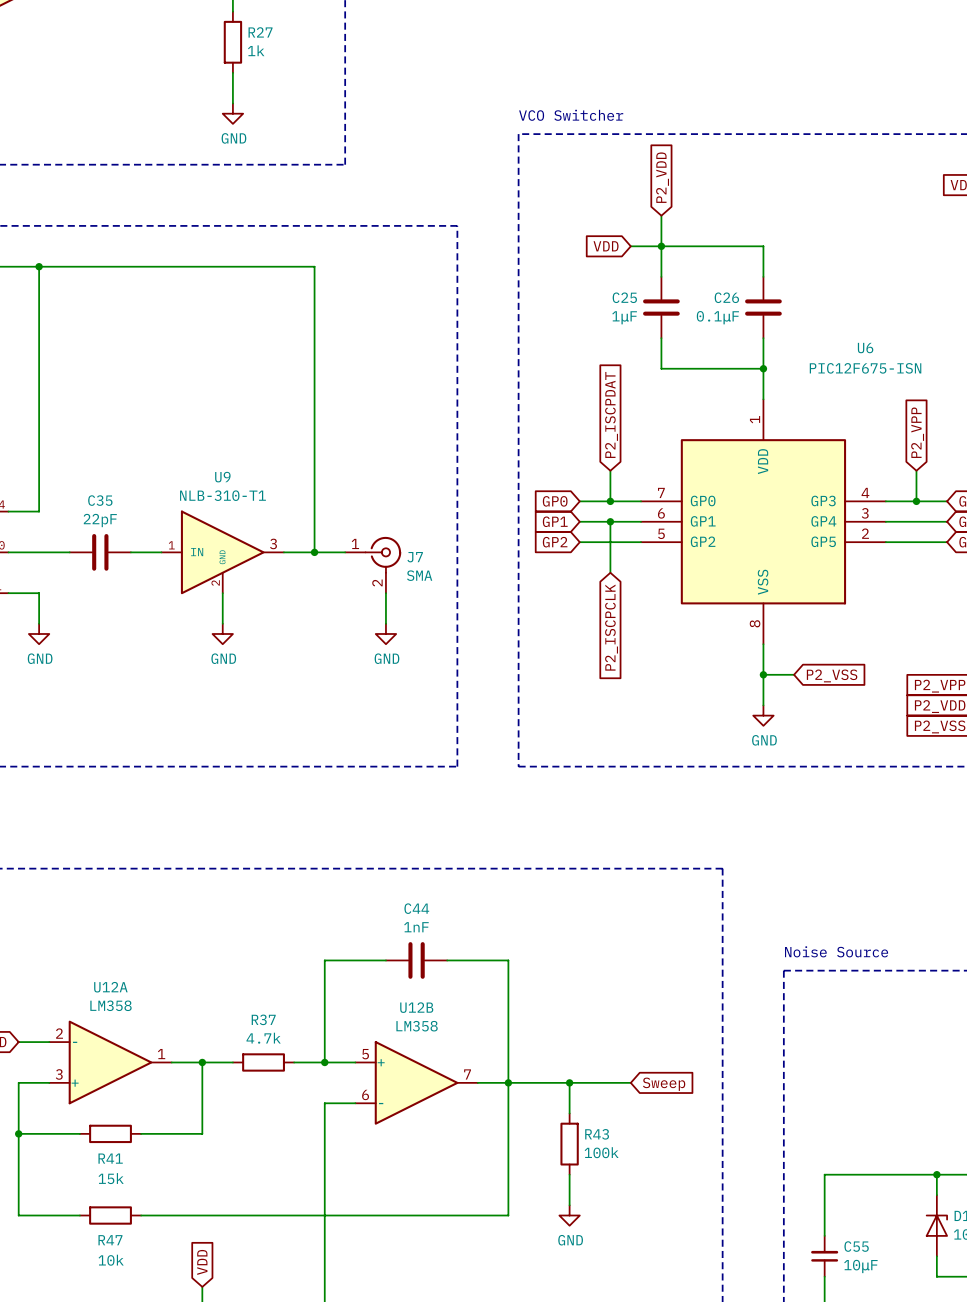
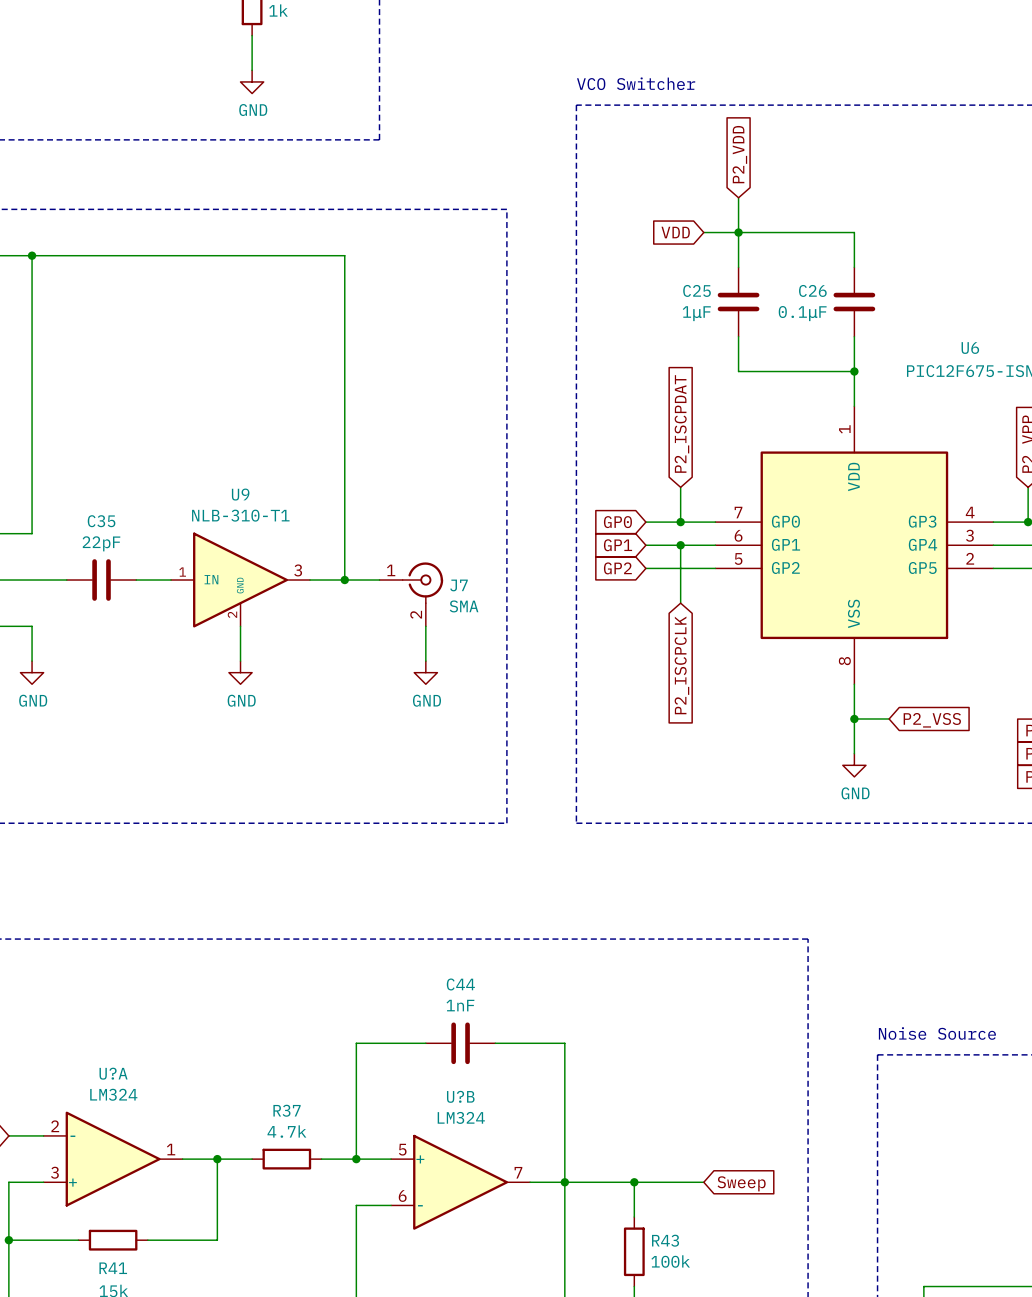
U12A name: U12A (110, 987) -> U?A (113, 1073)
U12A value: LM358 (110, 1005) -> LM324 (113, 1094)
U12B name: U12B (416, 1007) -> U?B (460, 1096)
U12B value: LM358 (417, 1026) -> LM324 (461, 1117)

